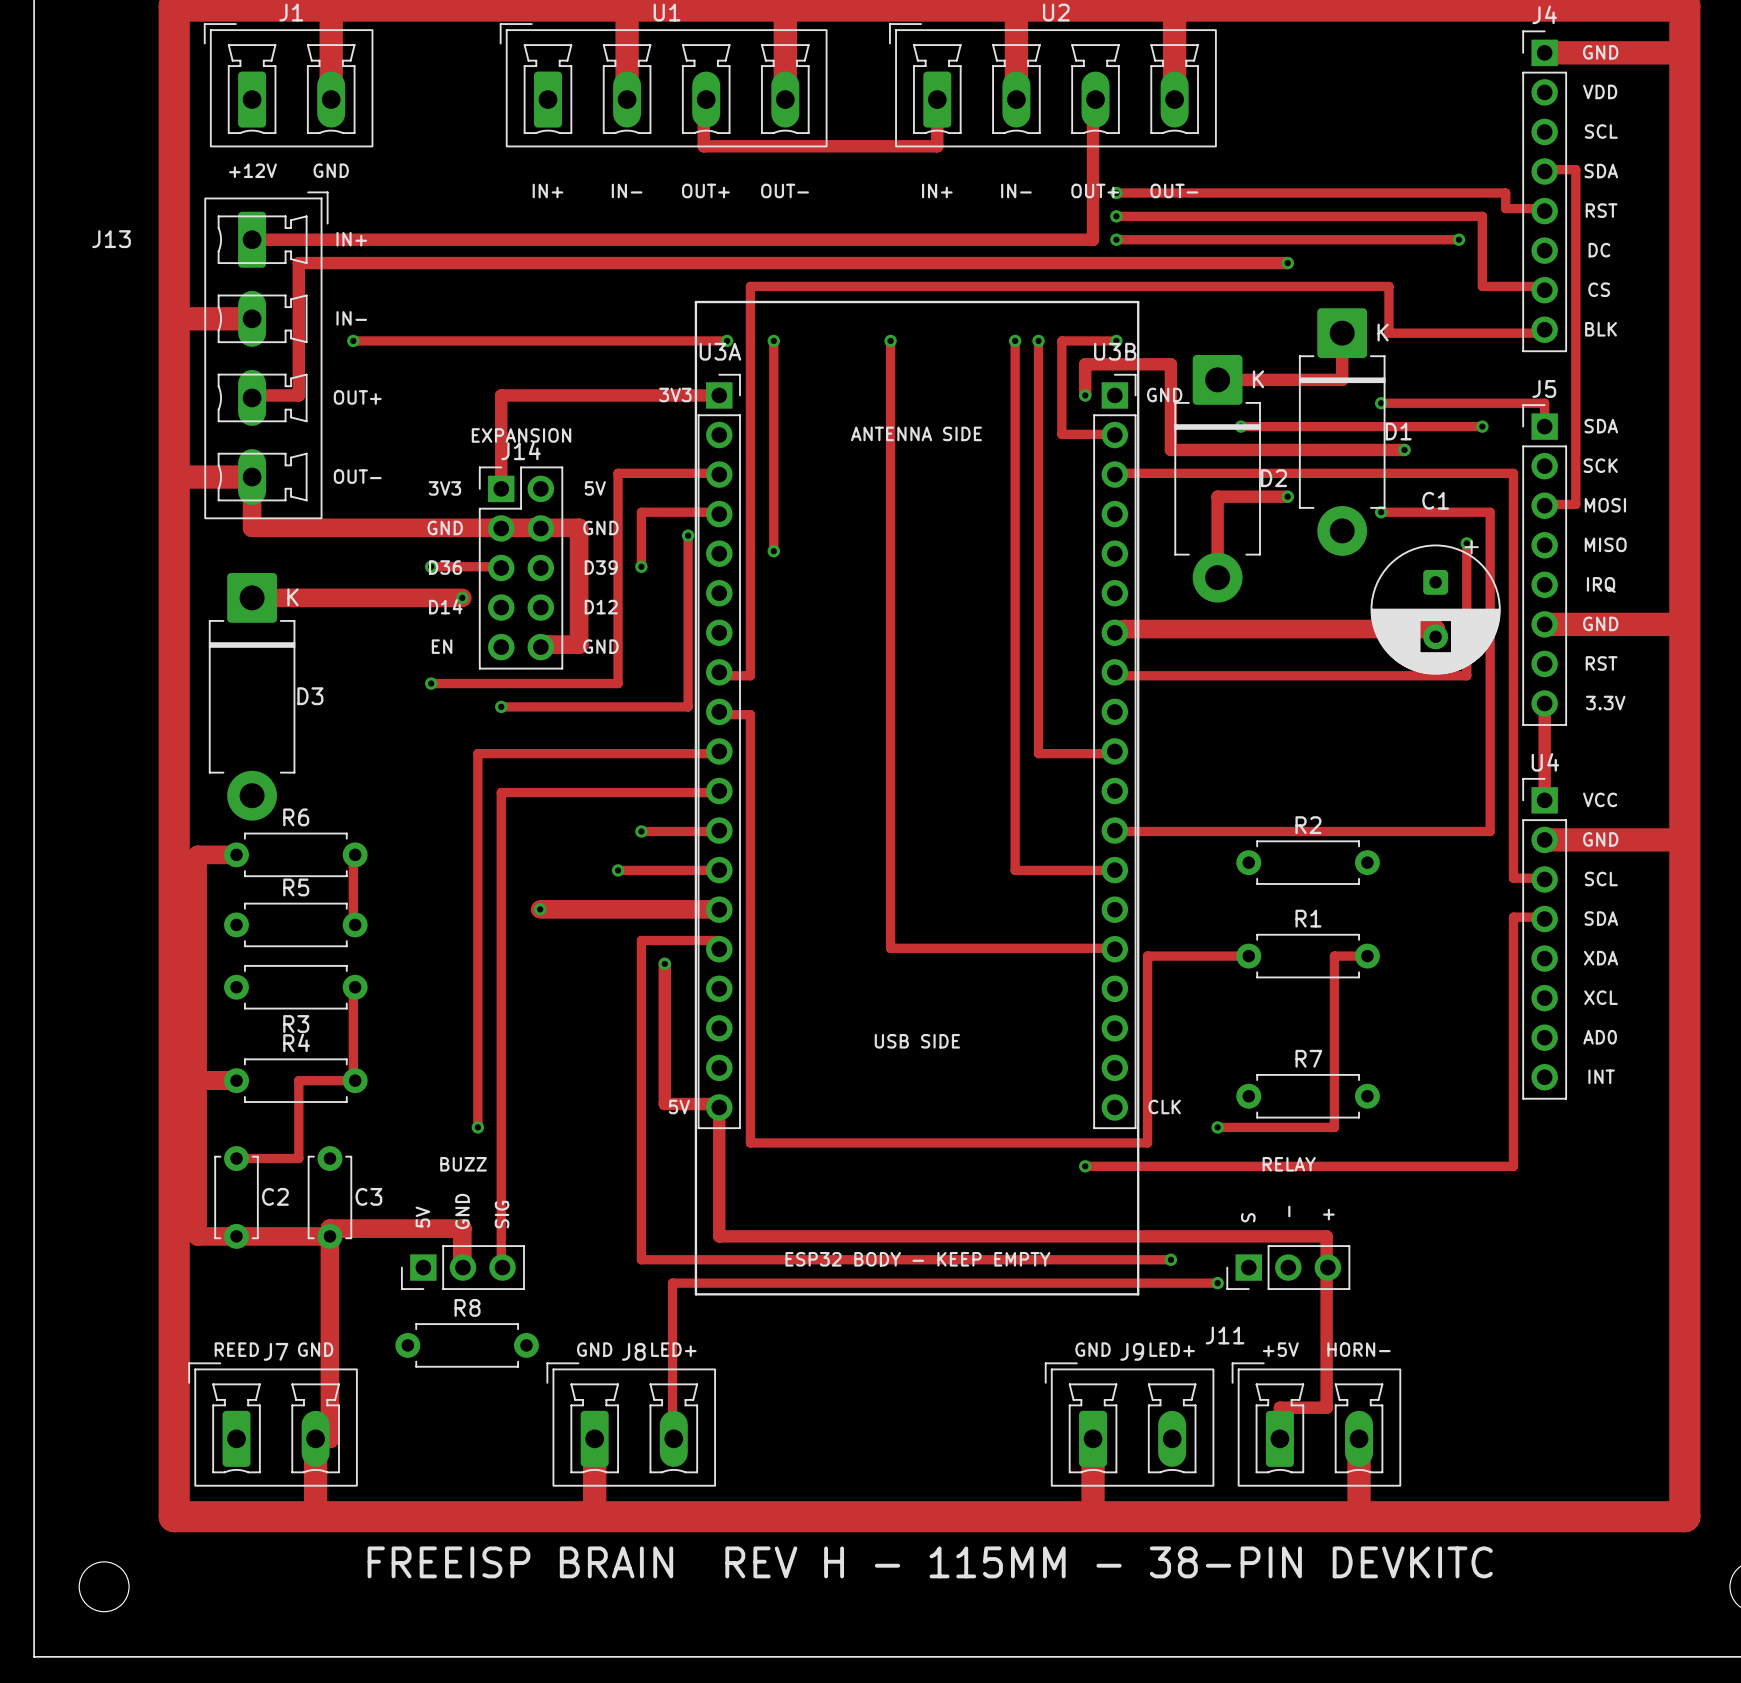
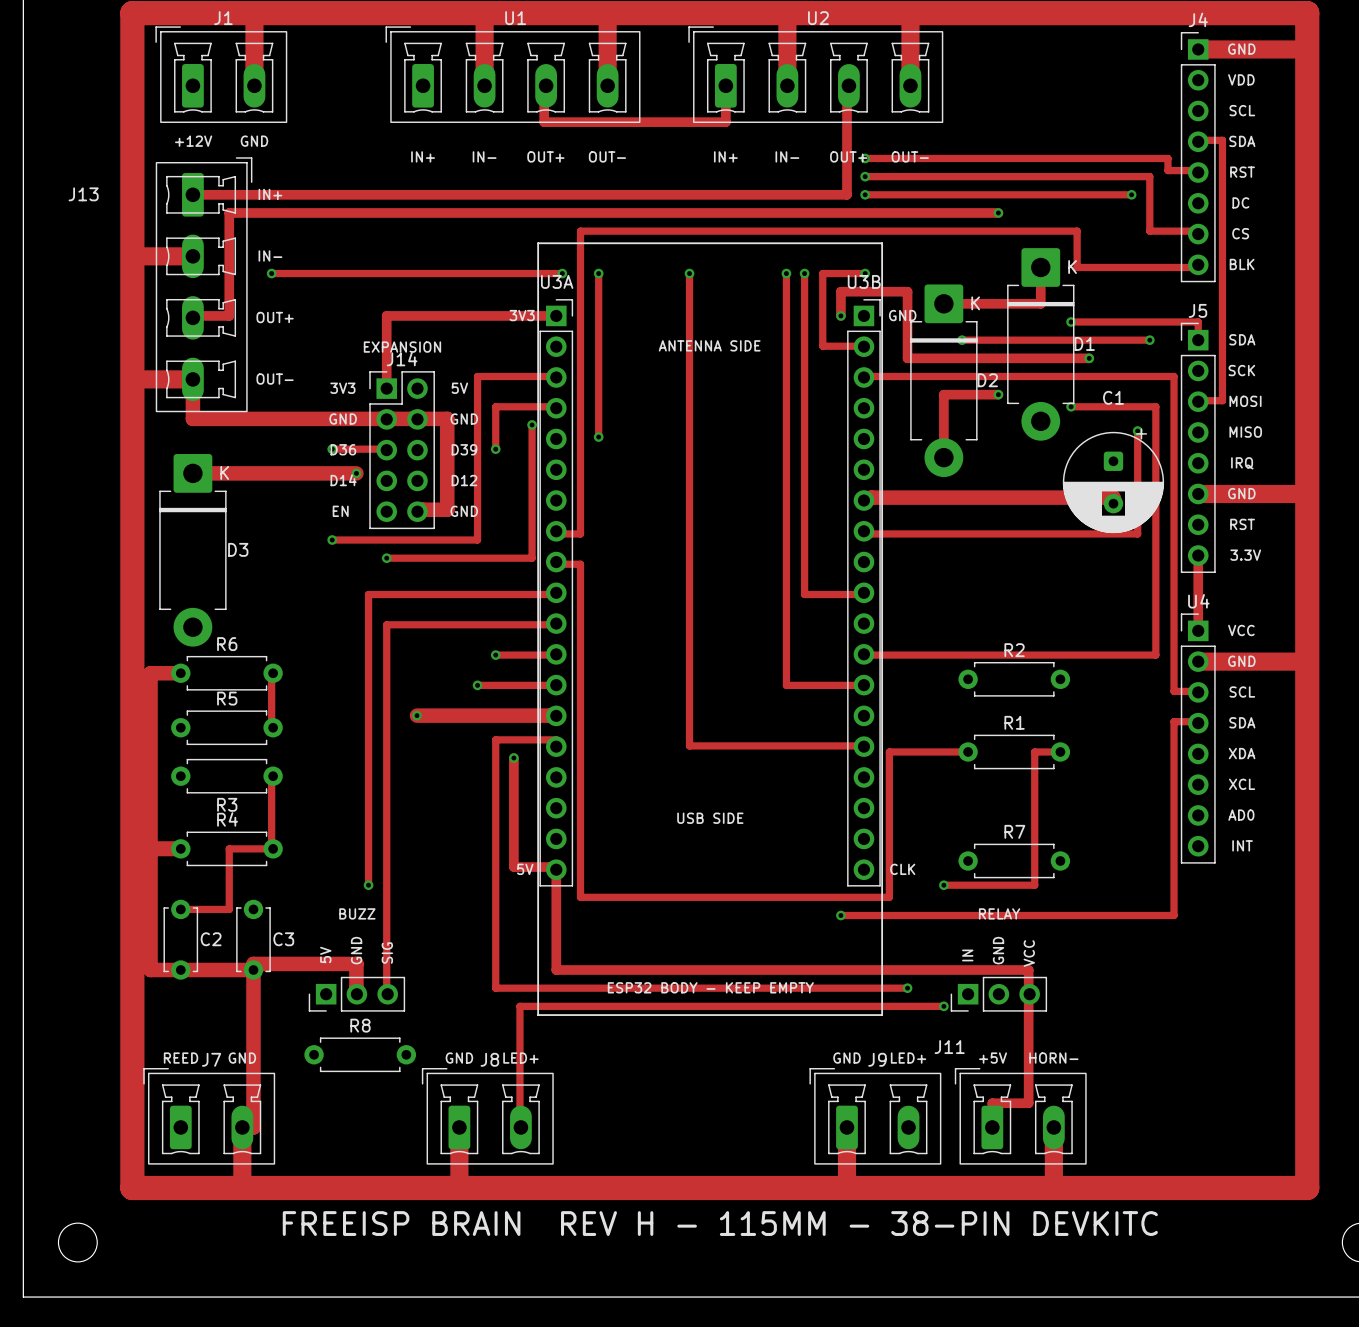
text: - (1289, 1211) -> GND (998, 950)
text: + (1328, 1214) -> VCC (1029, 953)
text: S (1248, 1217) -> IN (967, 955)

